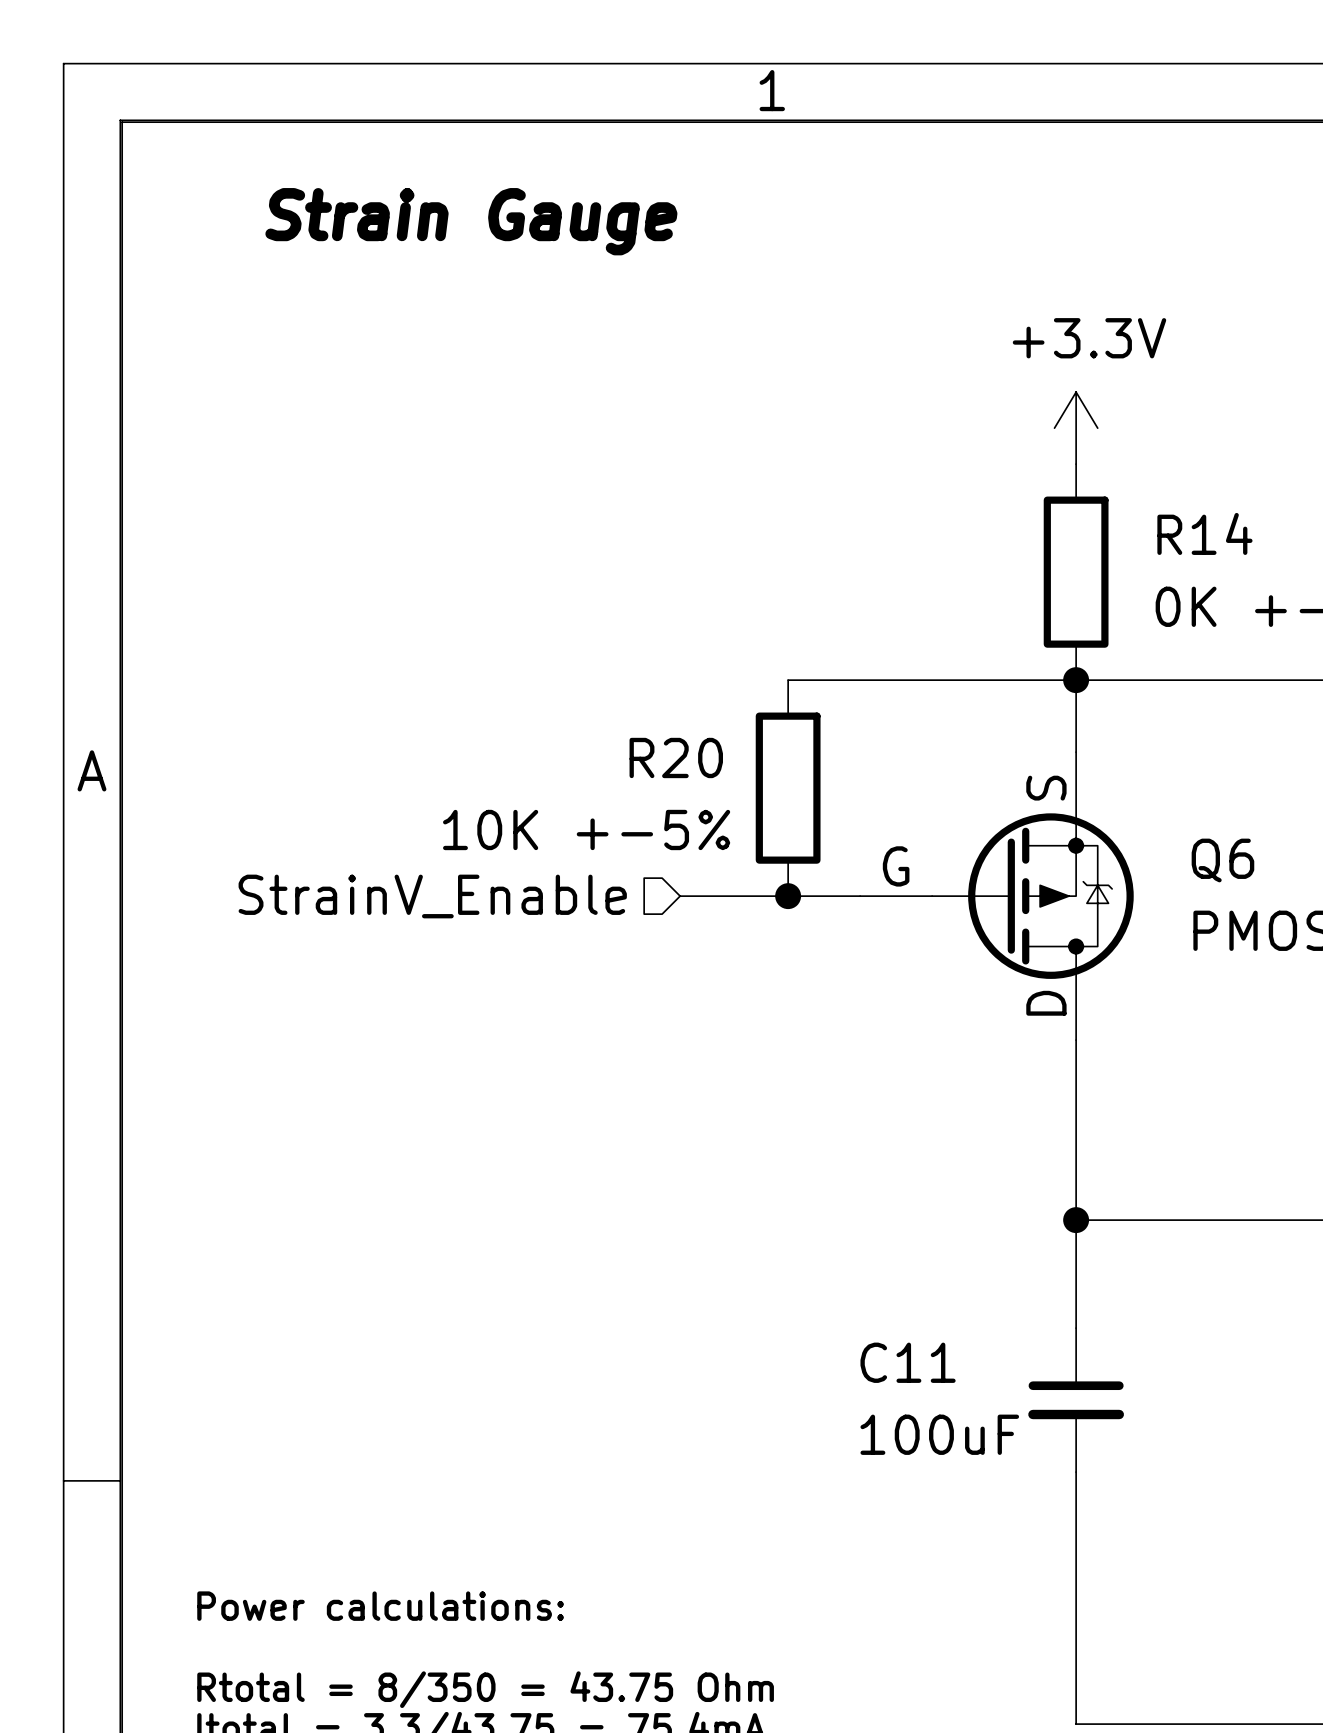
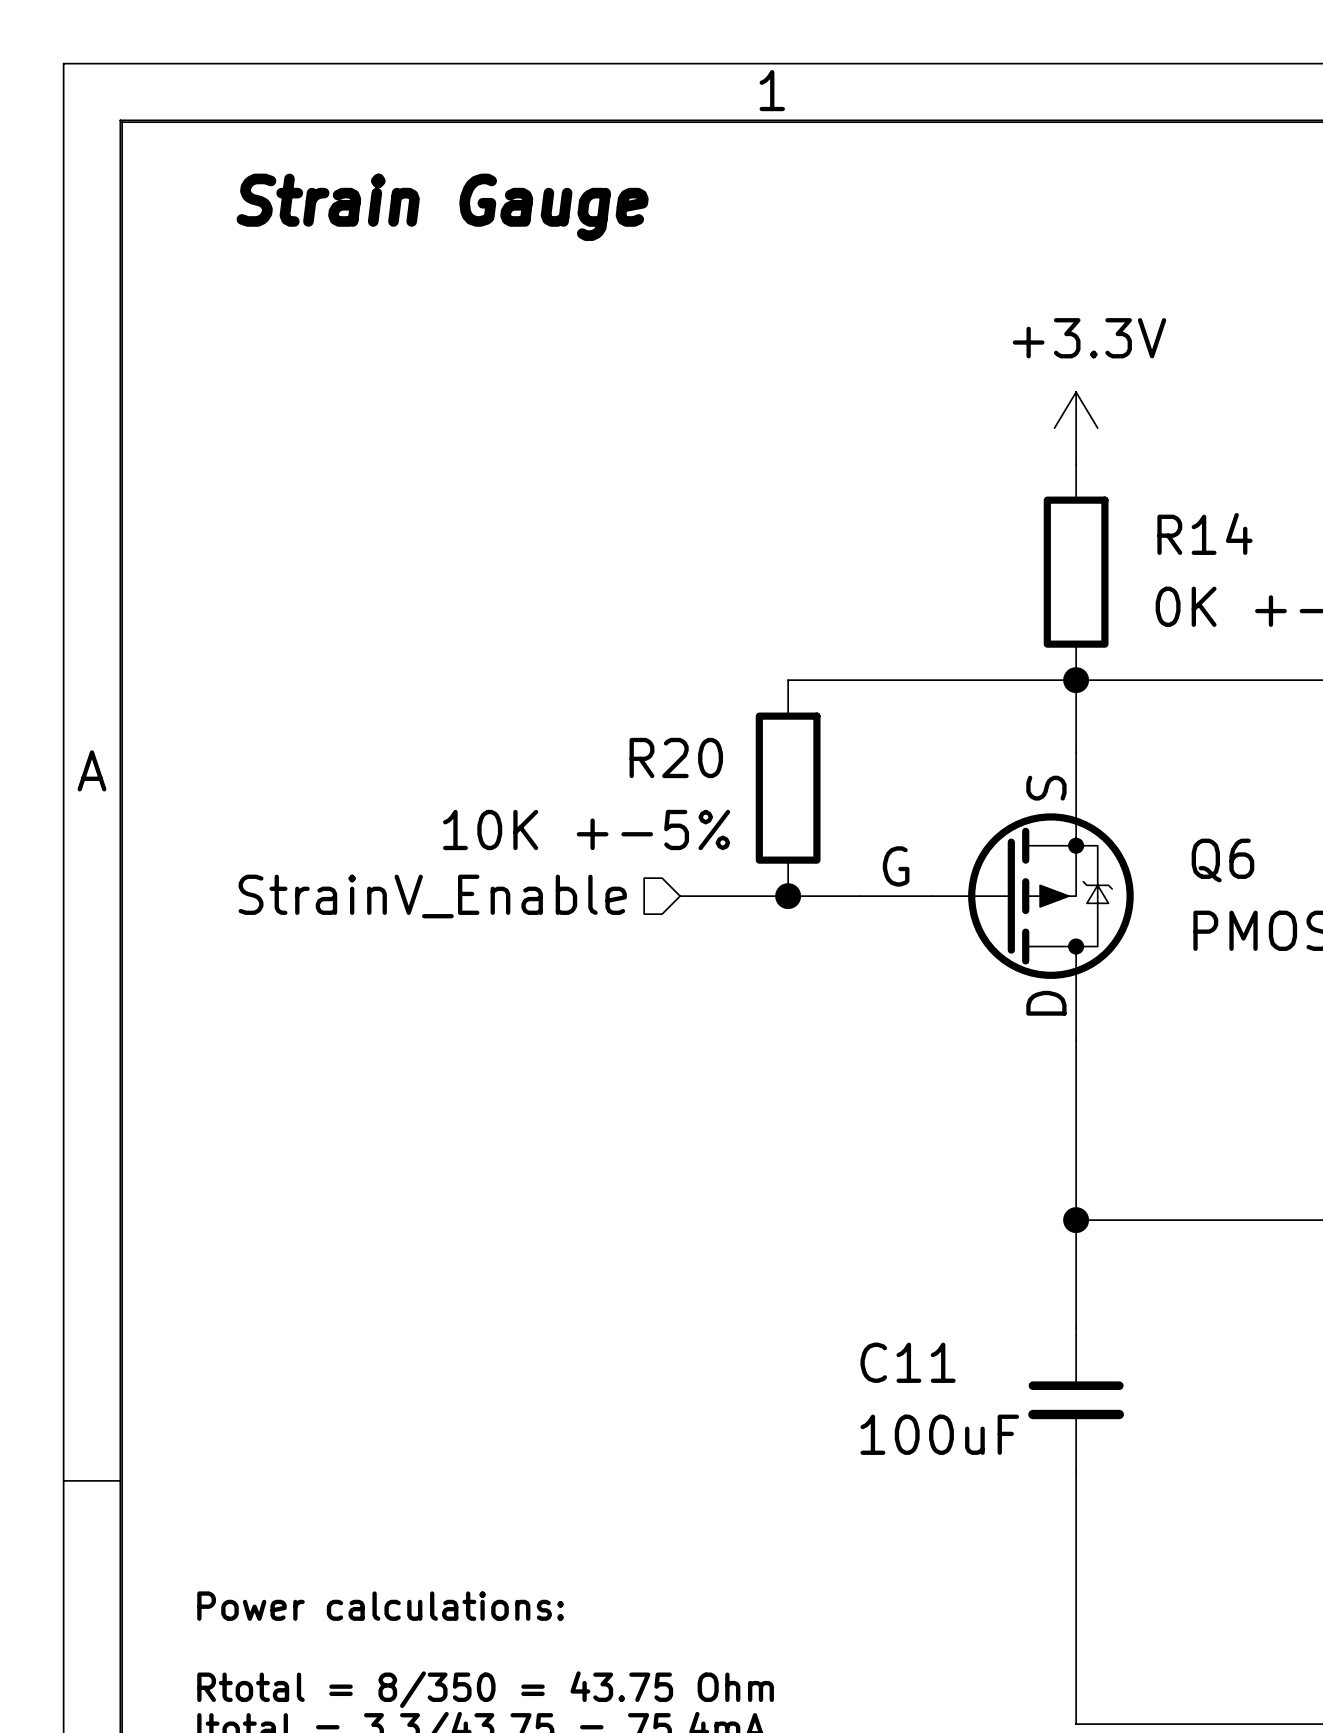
text position: Strain Gauge (471, 221) -> Strain Gauge (442, 207)

